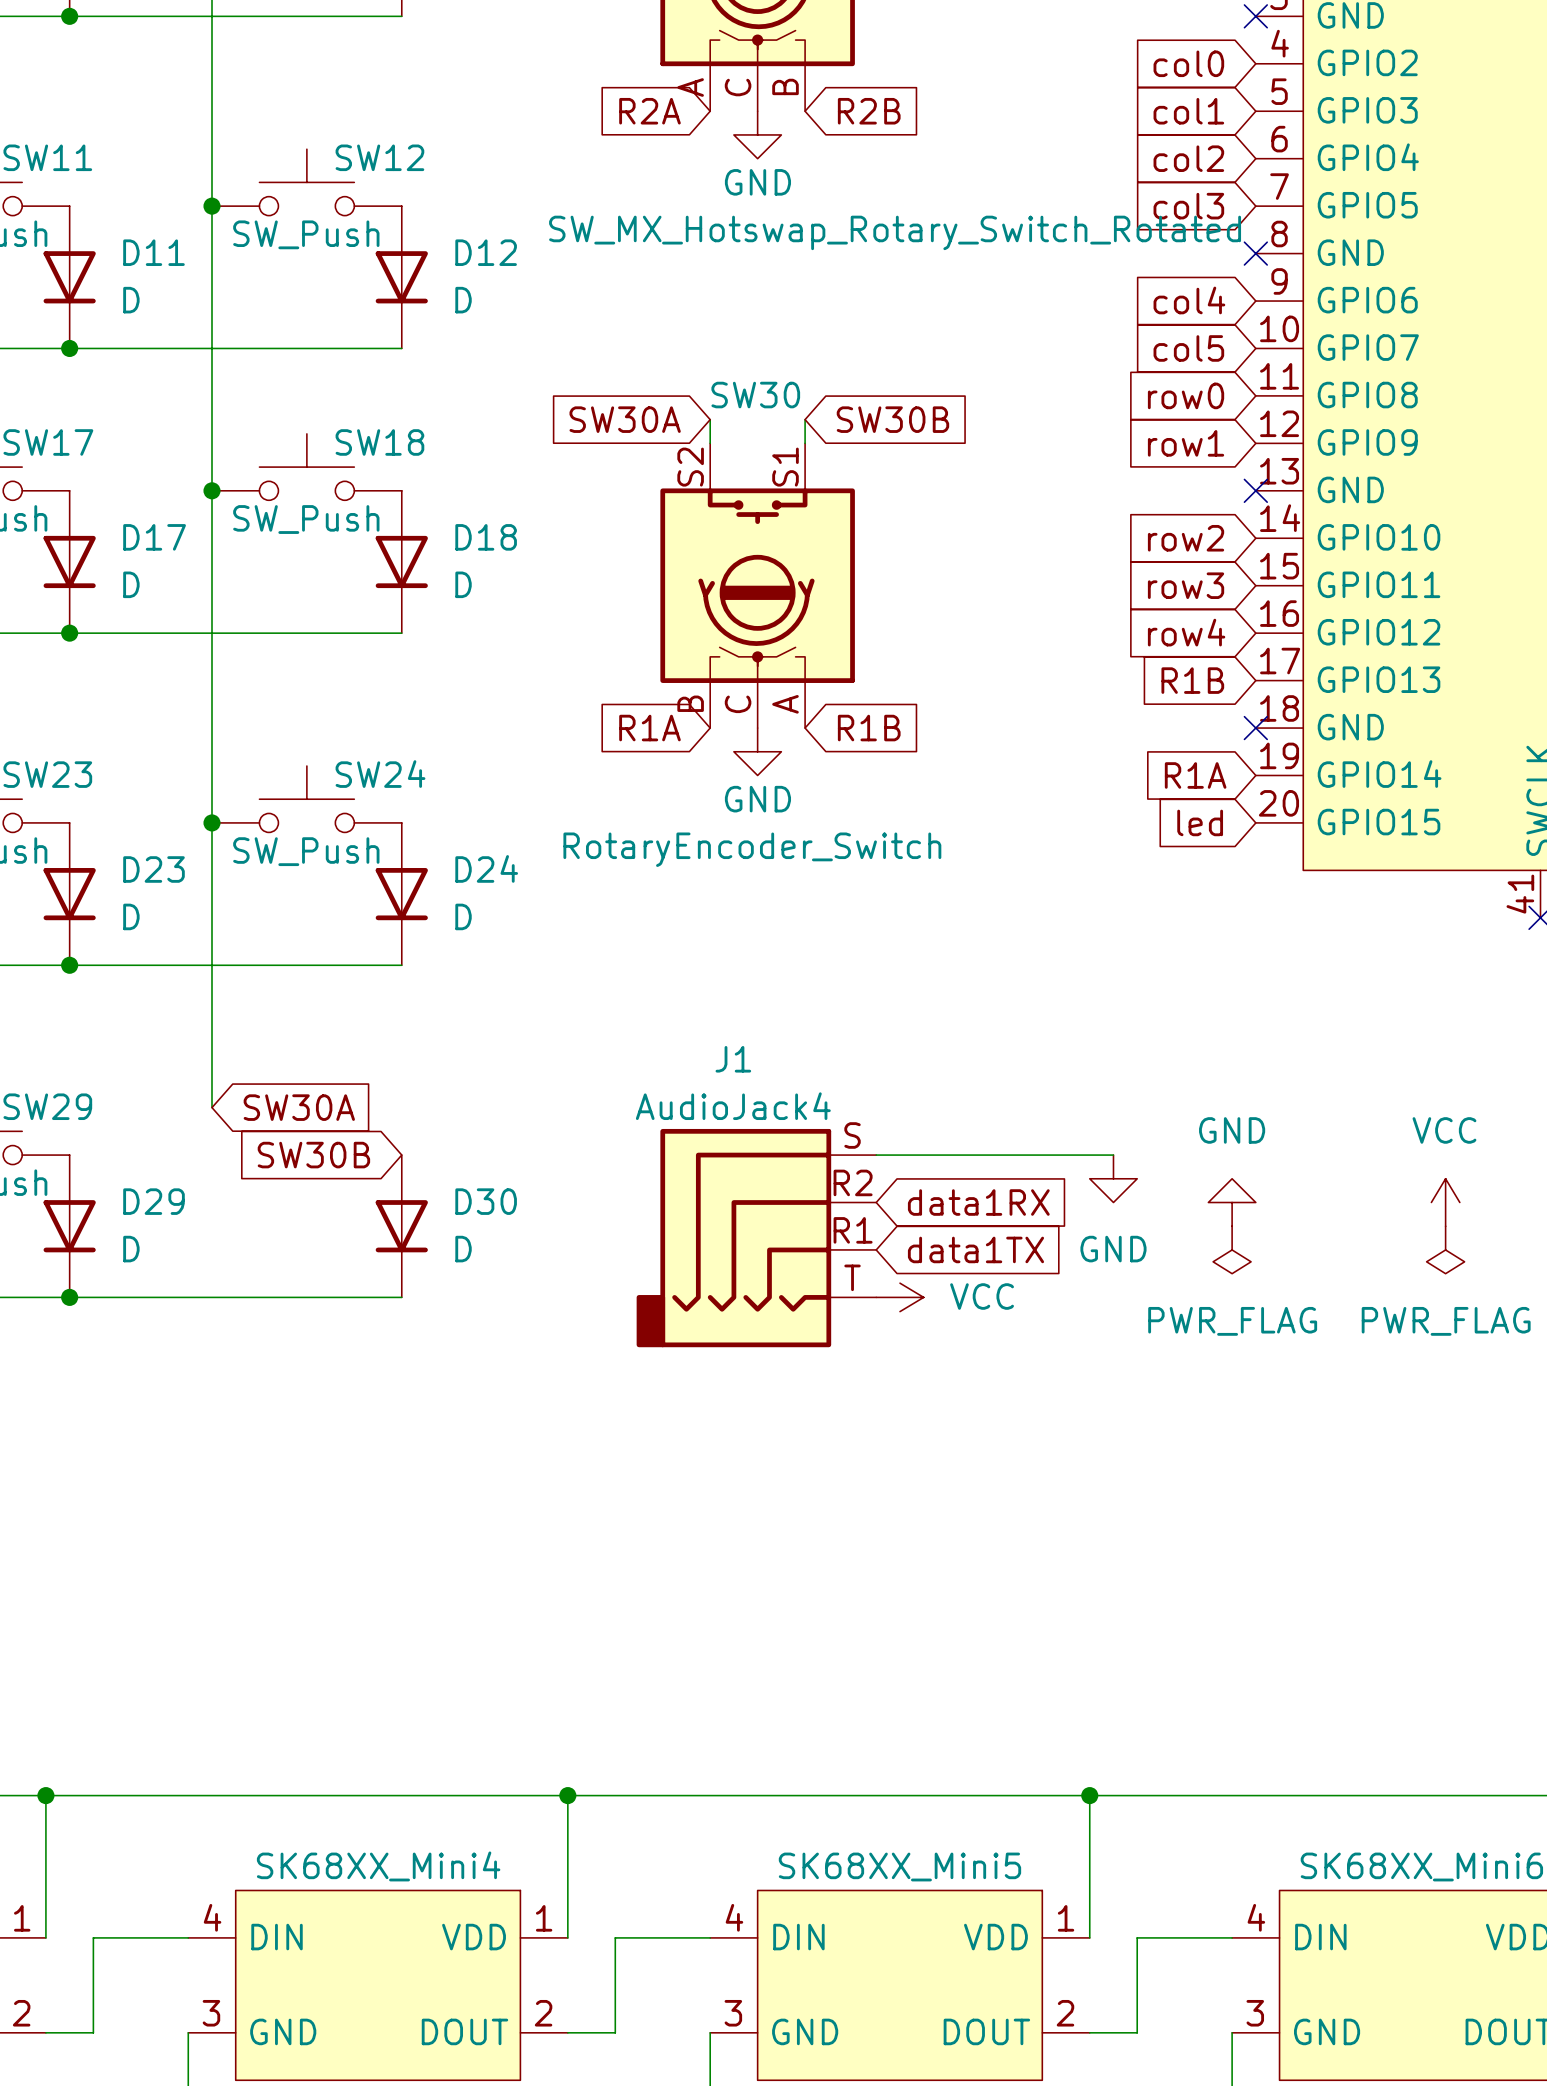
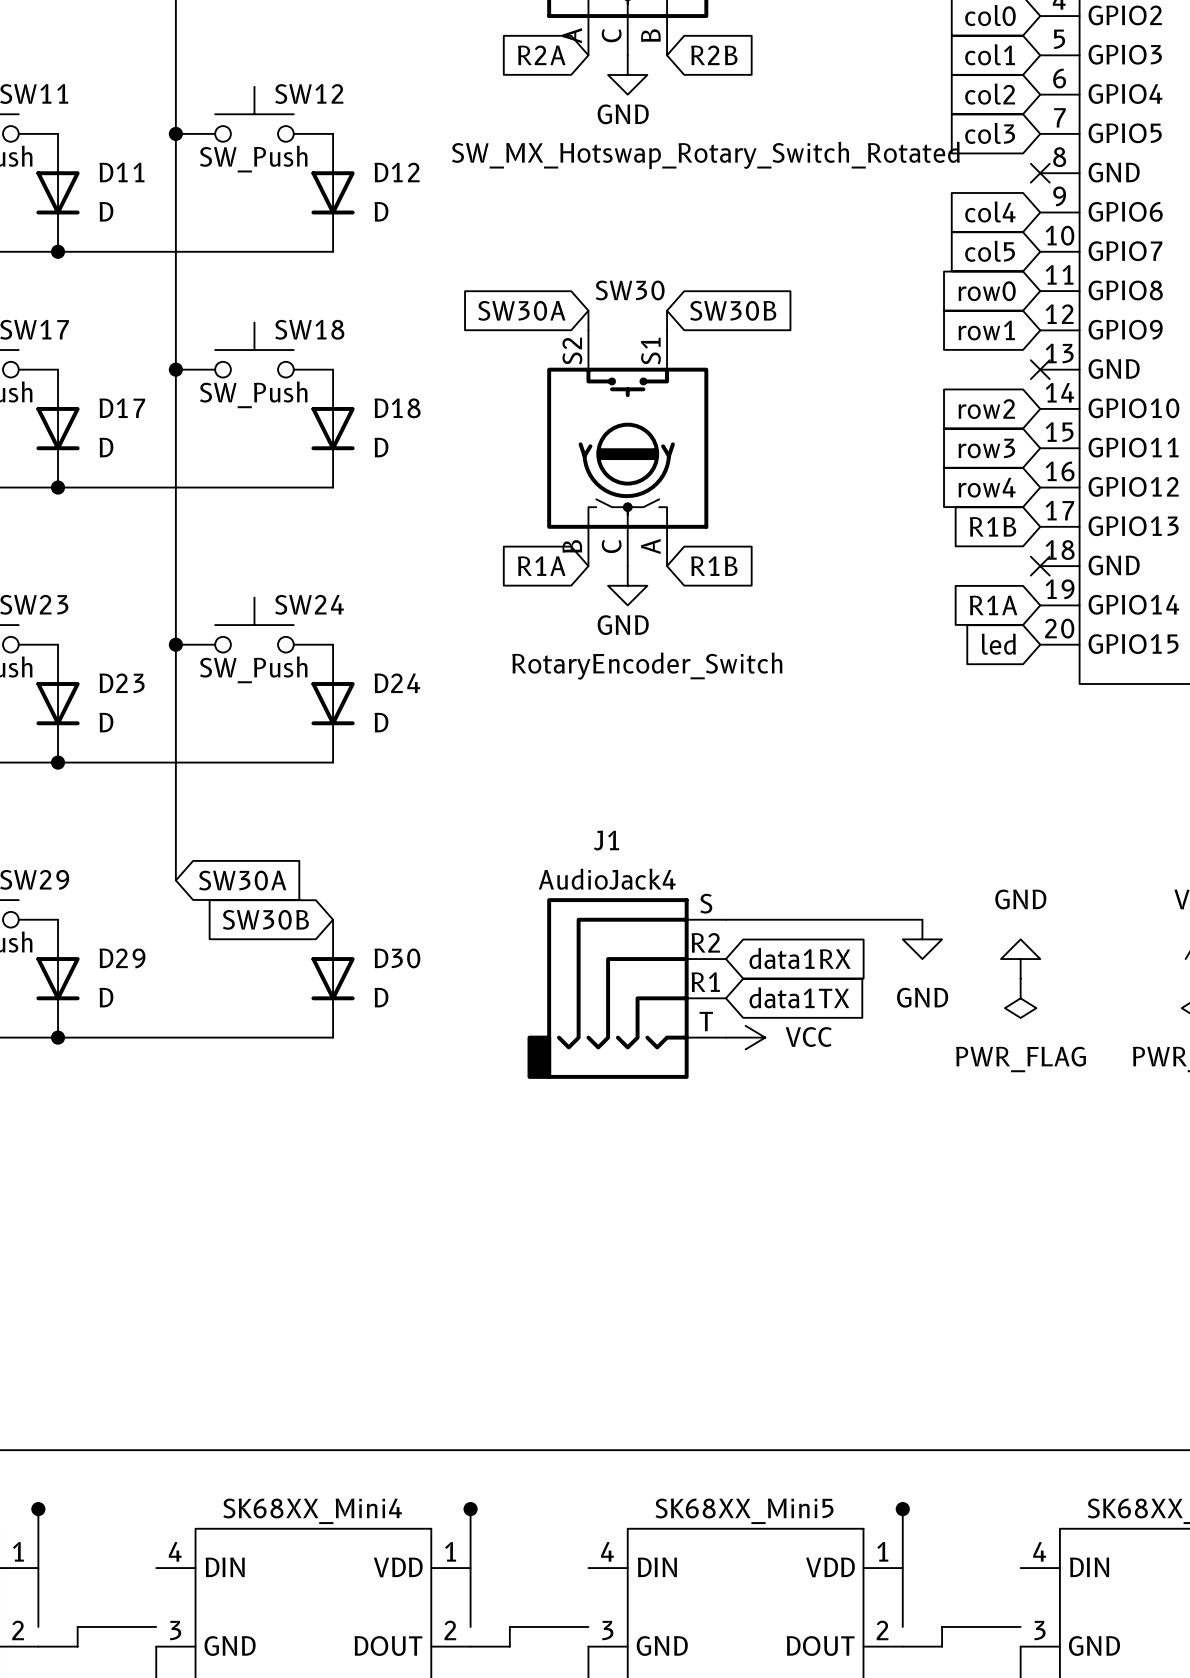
wire: (45, 1795) (45, 1866) -> (38, 1568) (38, 1626)
junction position: (45, 1795) -> (38, 1509)
wire: (567, 1795) (567, 1866) -> (470, 1568) (470, 1626)
junction position: (567, 1795) -> (470, 1509)
wire: (1089, 1795) (1089, 1866) -> (902, 1568) (902, 1626)
junction position: (1089, 1795) -> (902, 1509)
wire: (188, 1937) (93, 1937) (93, 2009) -> (156, 1626) (77, 1626)
wire: (710, 1937) (615, 1937) (615, 2009) -> (588, 1626) (509, 1626)
wire: (1232, 1937) (1137, 1937) (1137, 2009) -> (1020, 1626) (942, 1626)

